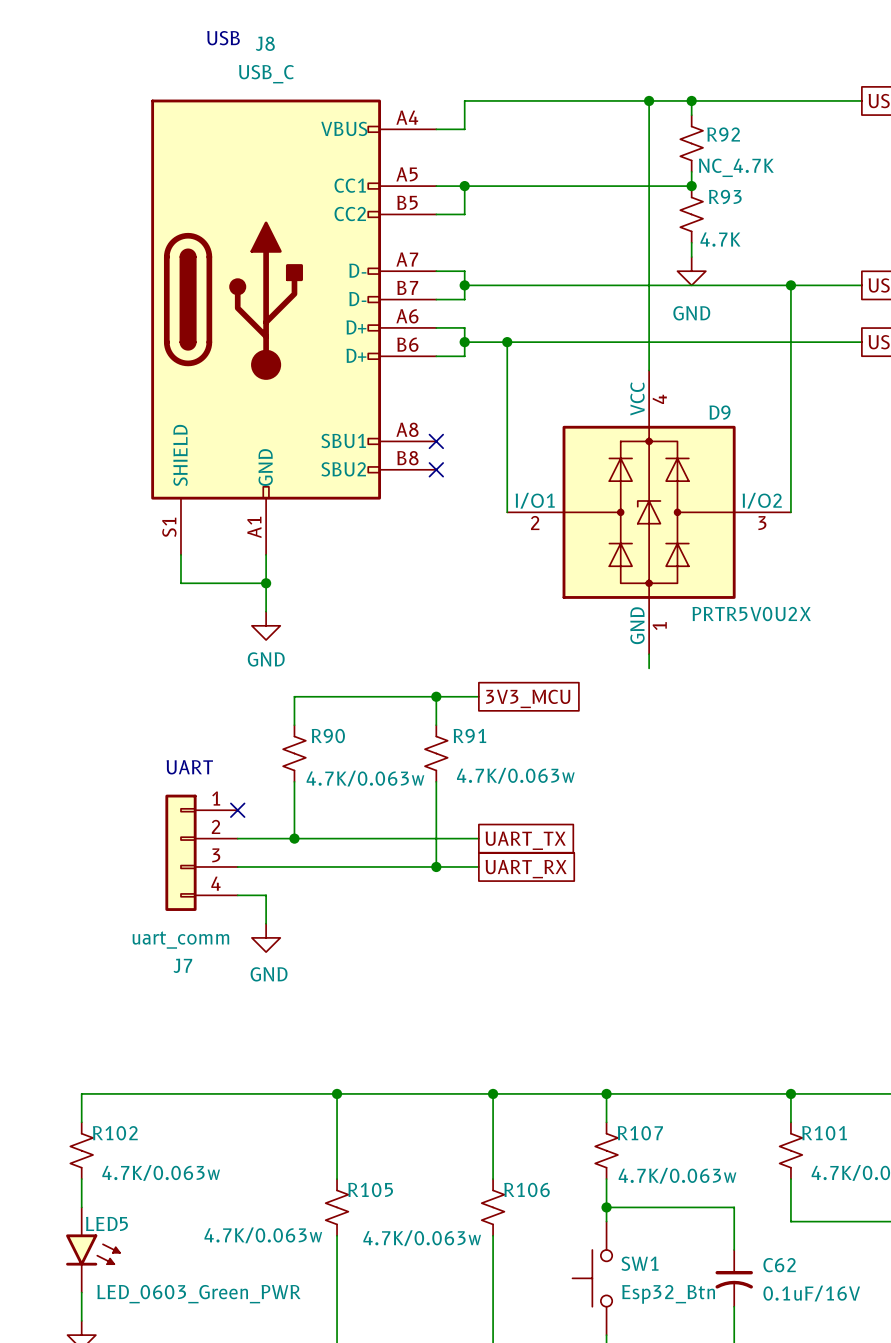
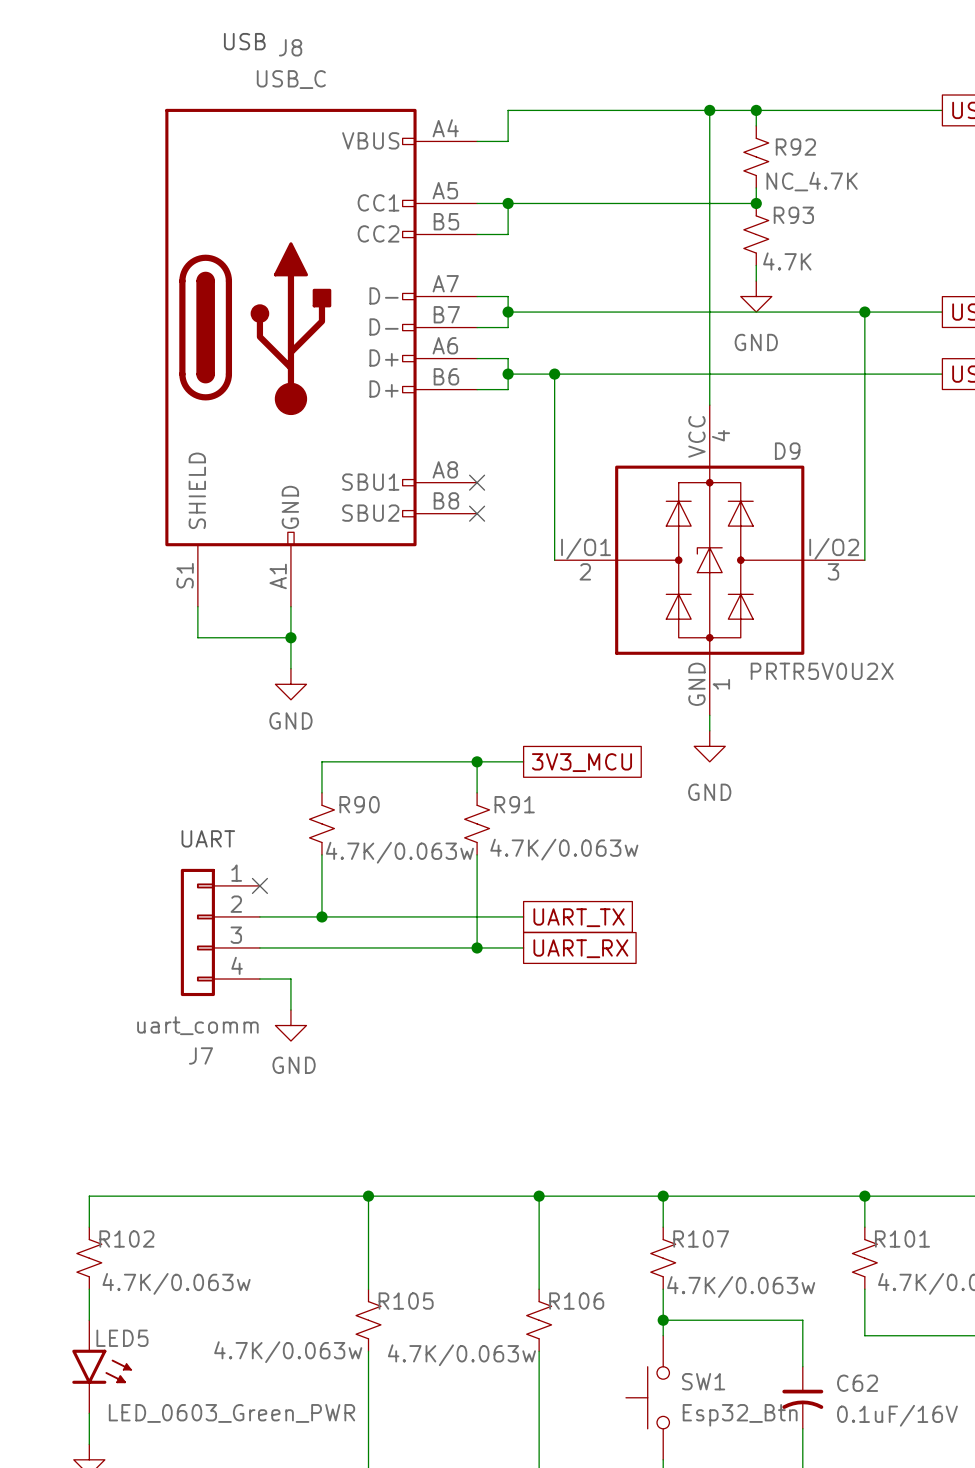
power symbol: none -> GND (709, 746)

